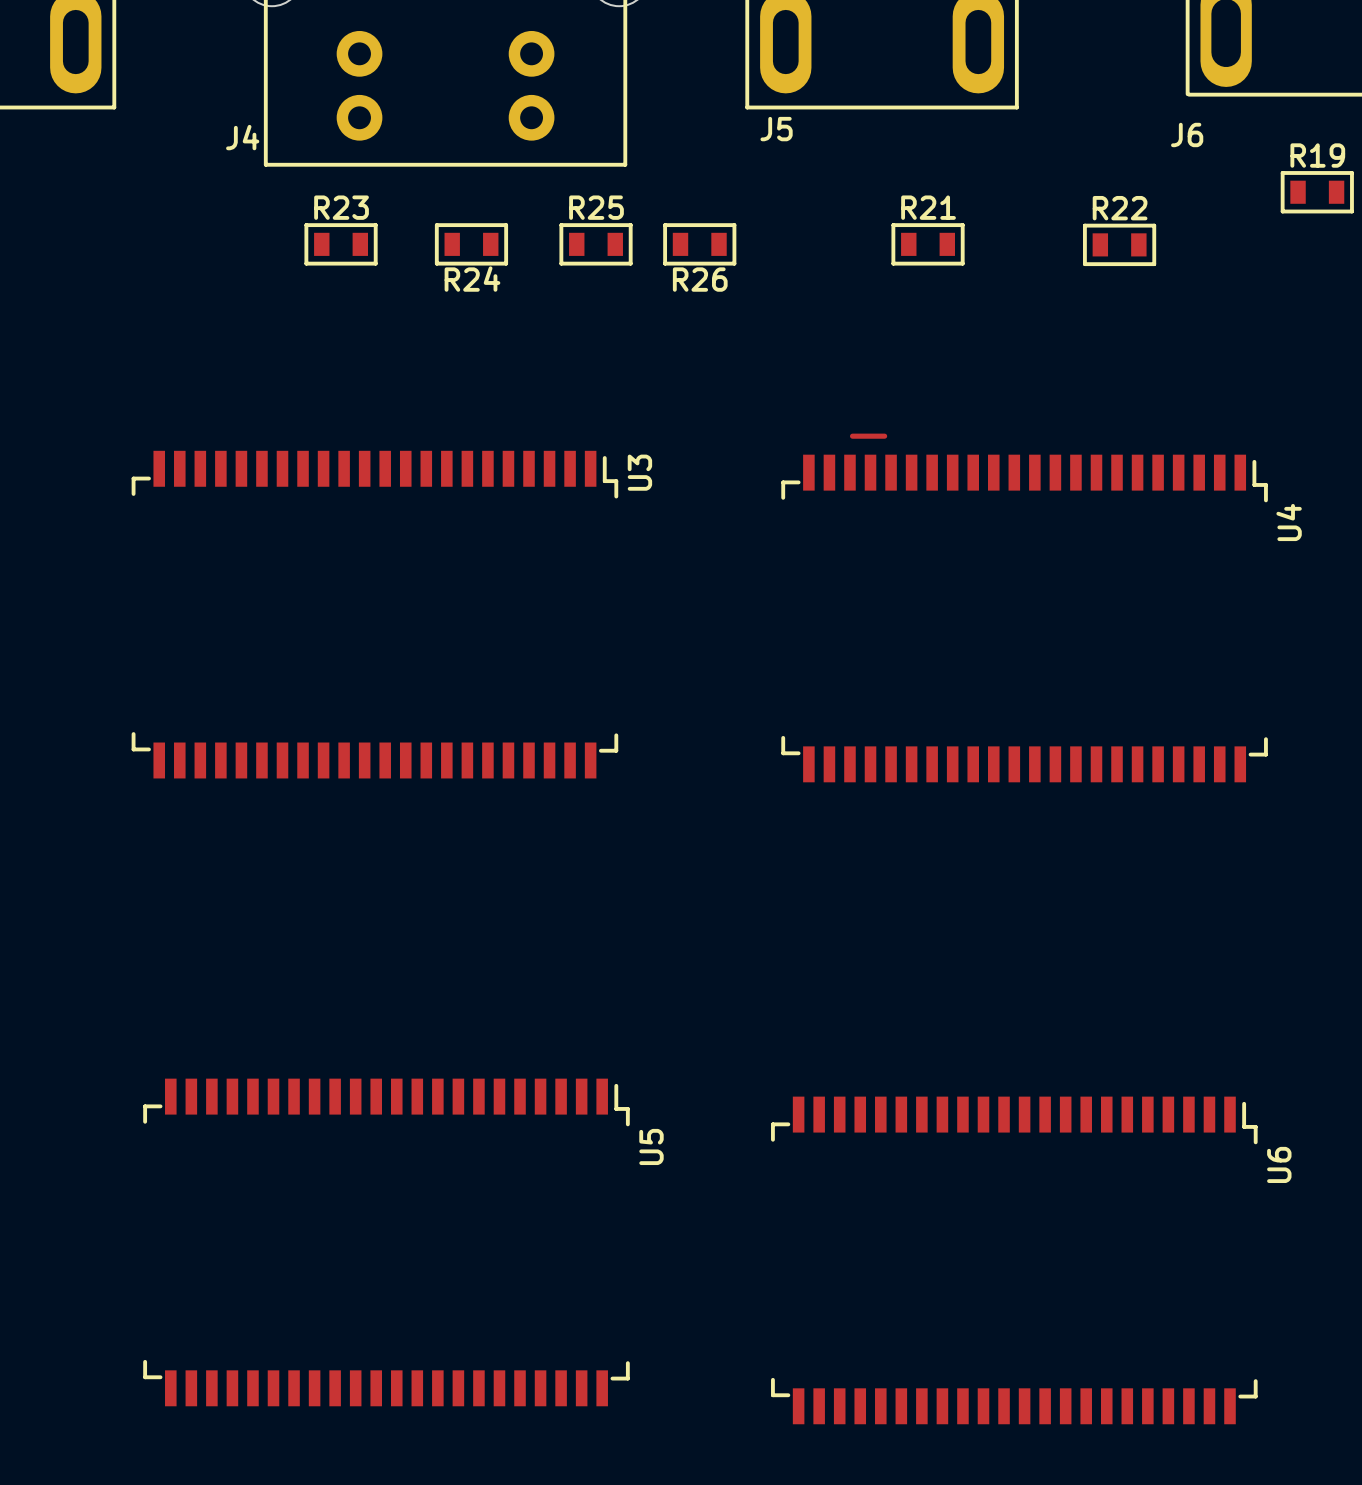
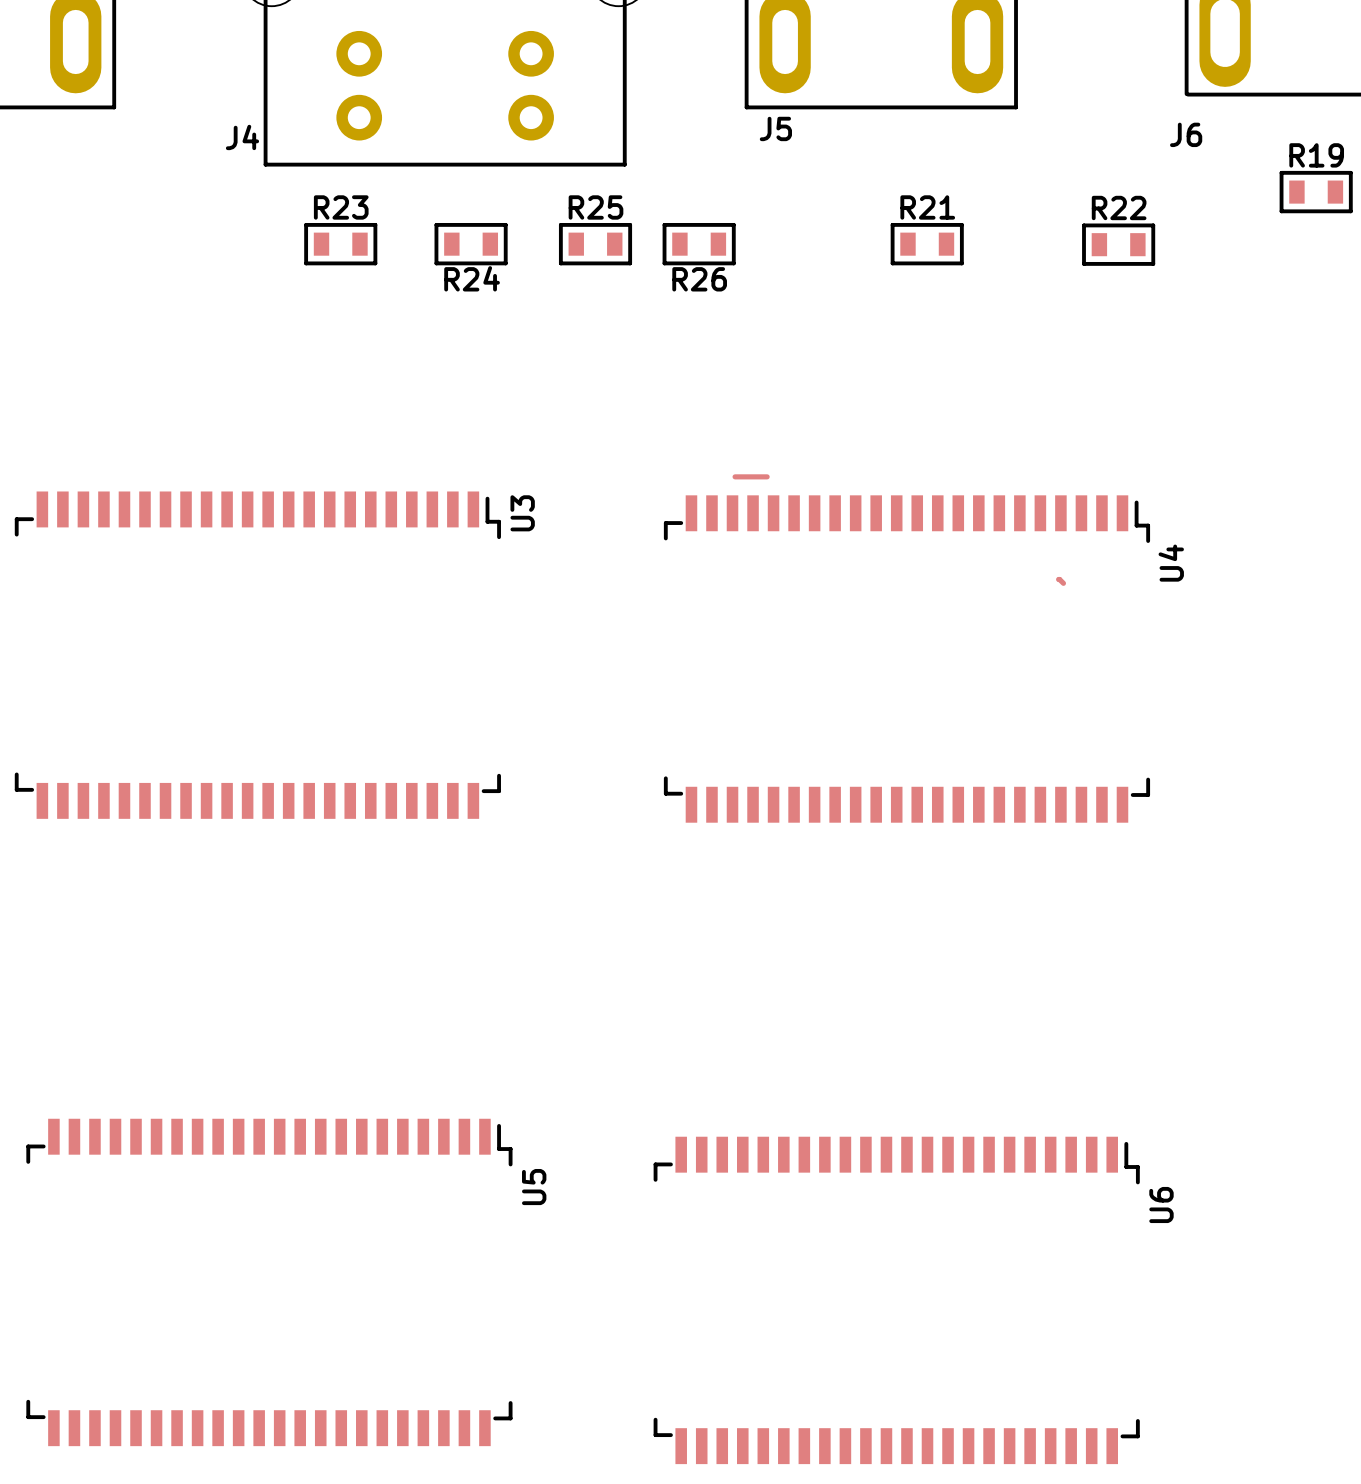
top track: (852, 436) (884, 436) -> (735, 476) (767, 476)
top track: none -> (1058, 579) (1063, 583)
U3 position: (374, 614) -> (257, 655)
U4 position: (1024, 618) -> (906, 659)
U5 position: (386, 1242) -> (269, 1282)
U6 position: (1014, 1260) -> (896, 1300)

